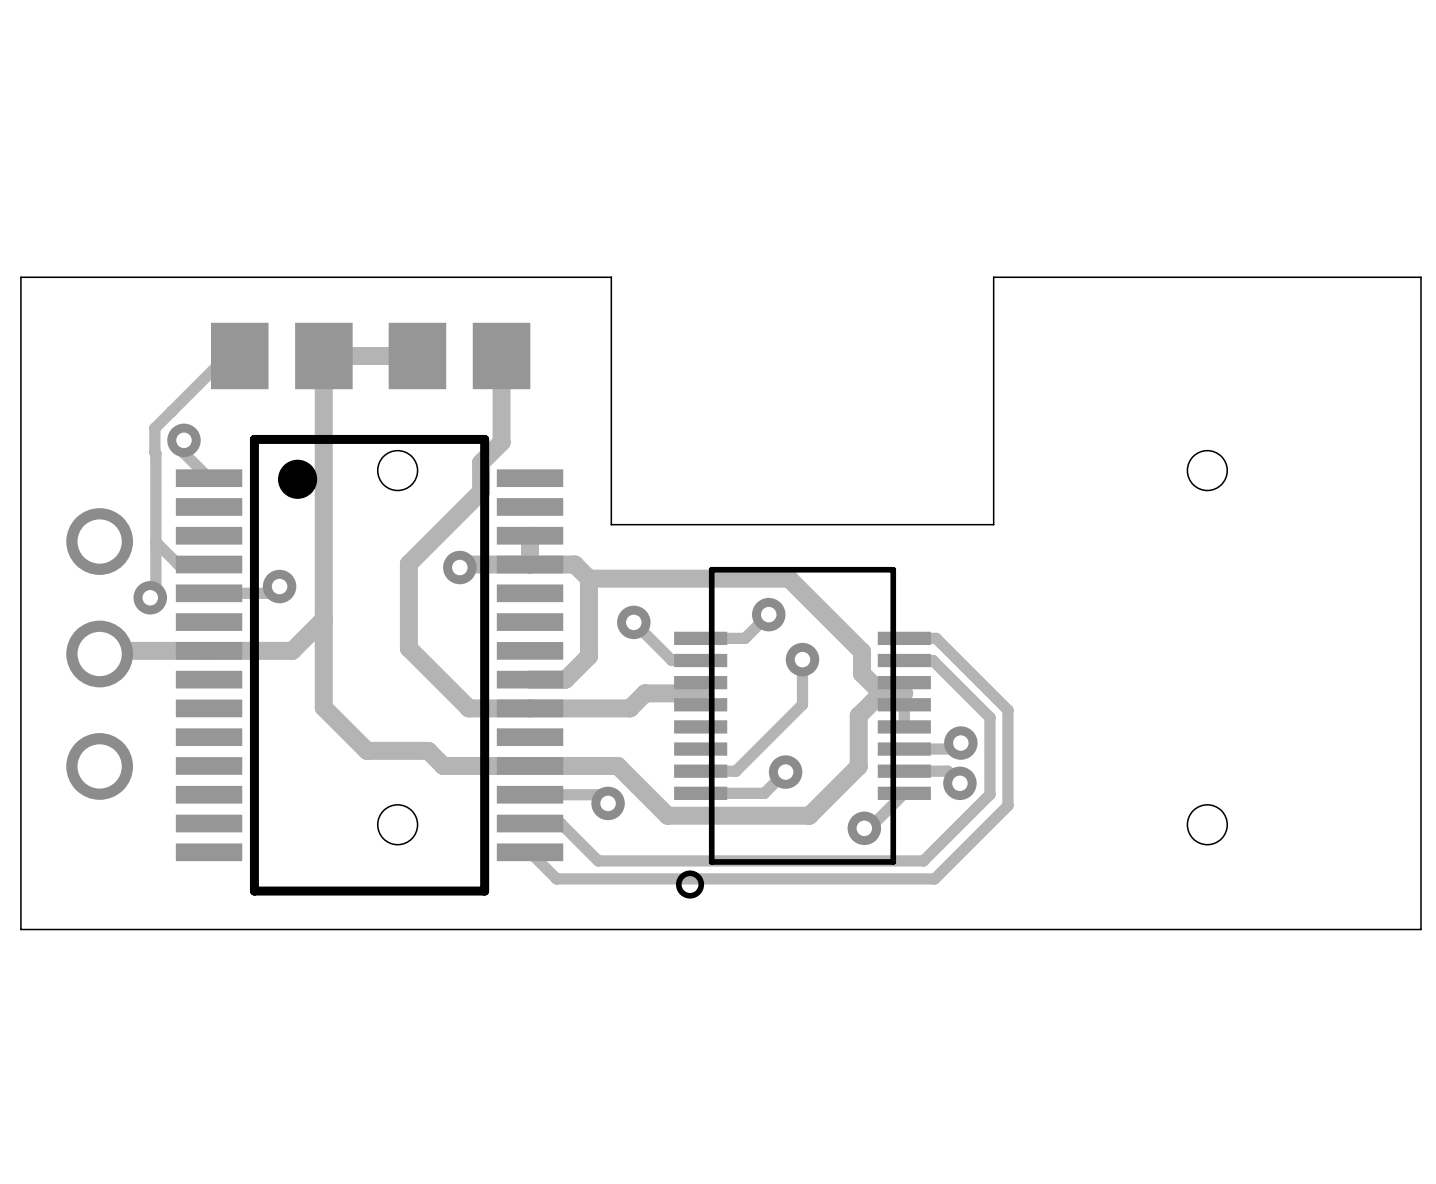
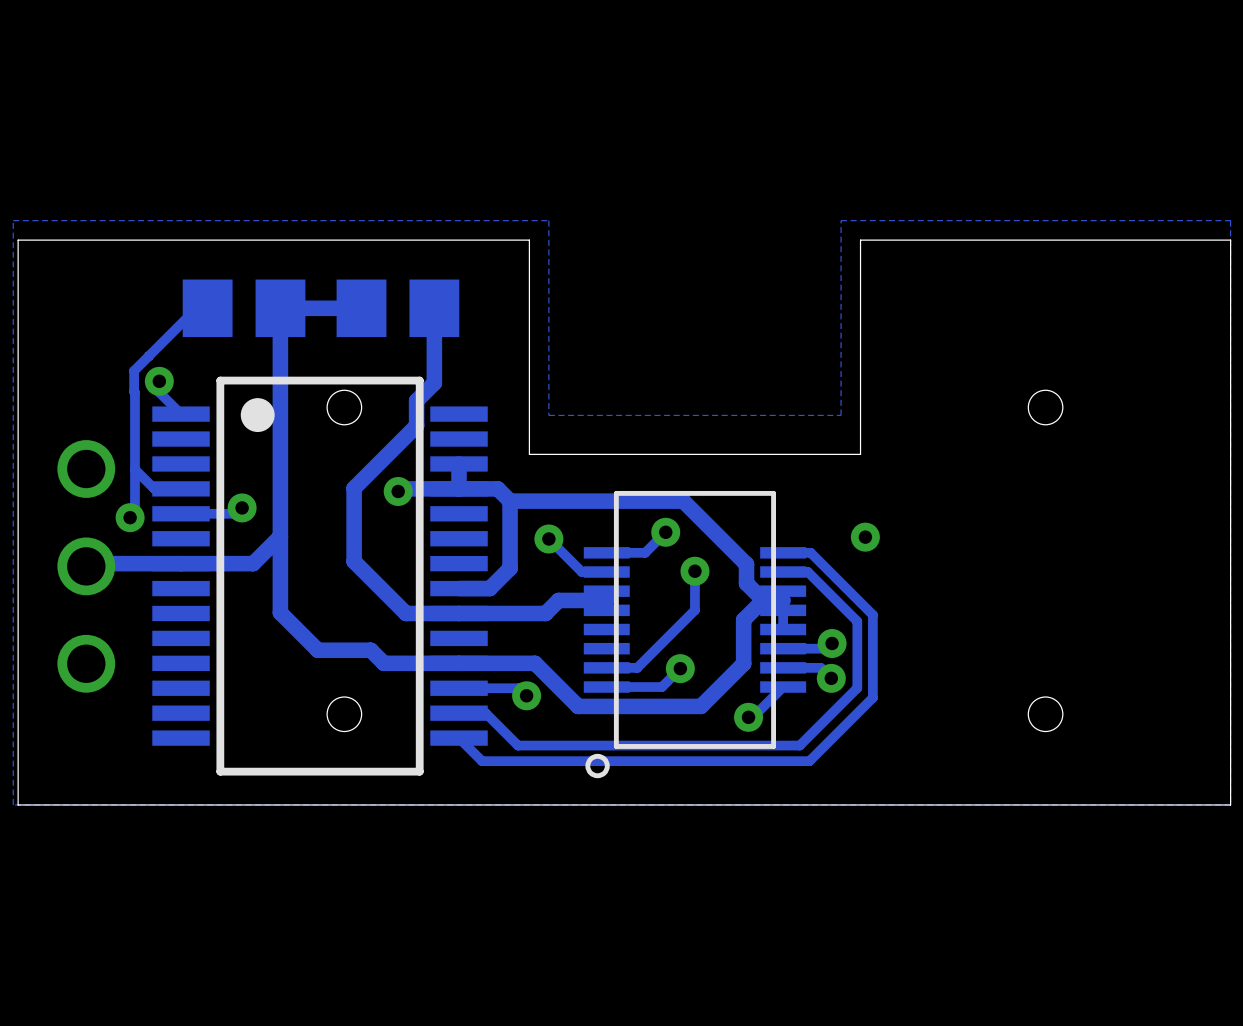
zone outline: none -> (1230, 220) (841, 220) (841, 415) (548, 415) (548, 220) (13, 220) (13, 804) (1230, 804) (1230, 220)
via: none -> (865, 537)

